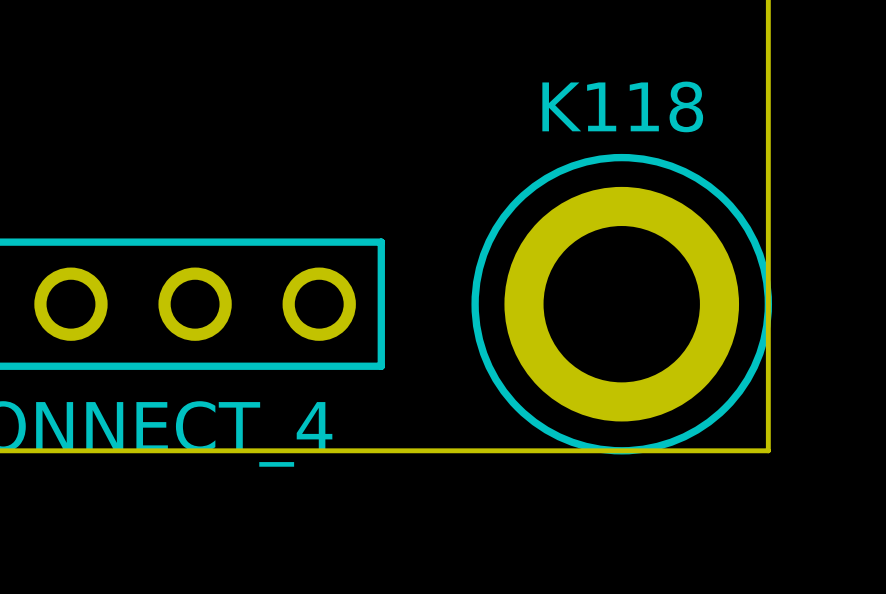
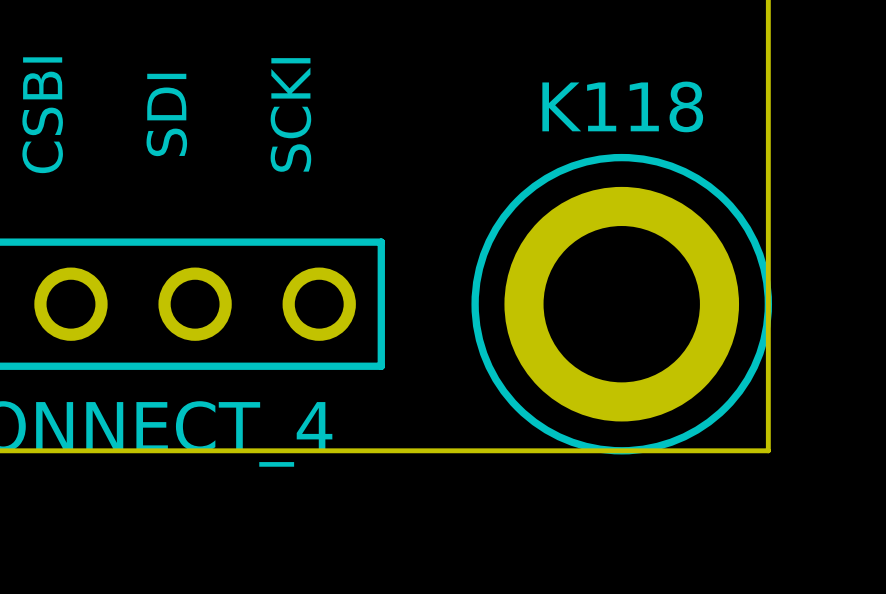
text: none -> SDI (166, 114)
text: none -> SCKI (290, 114)
text: none -> CSBI (42, 115)

